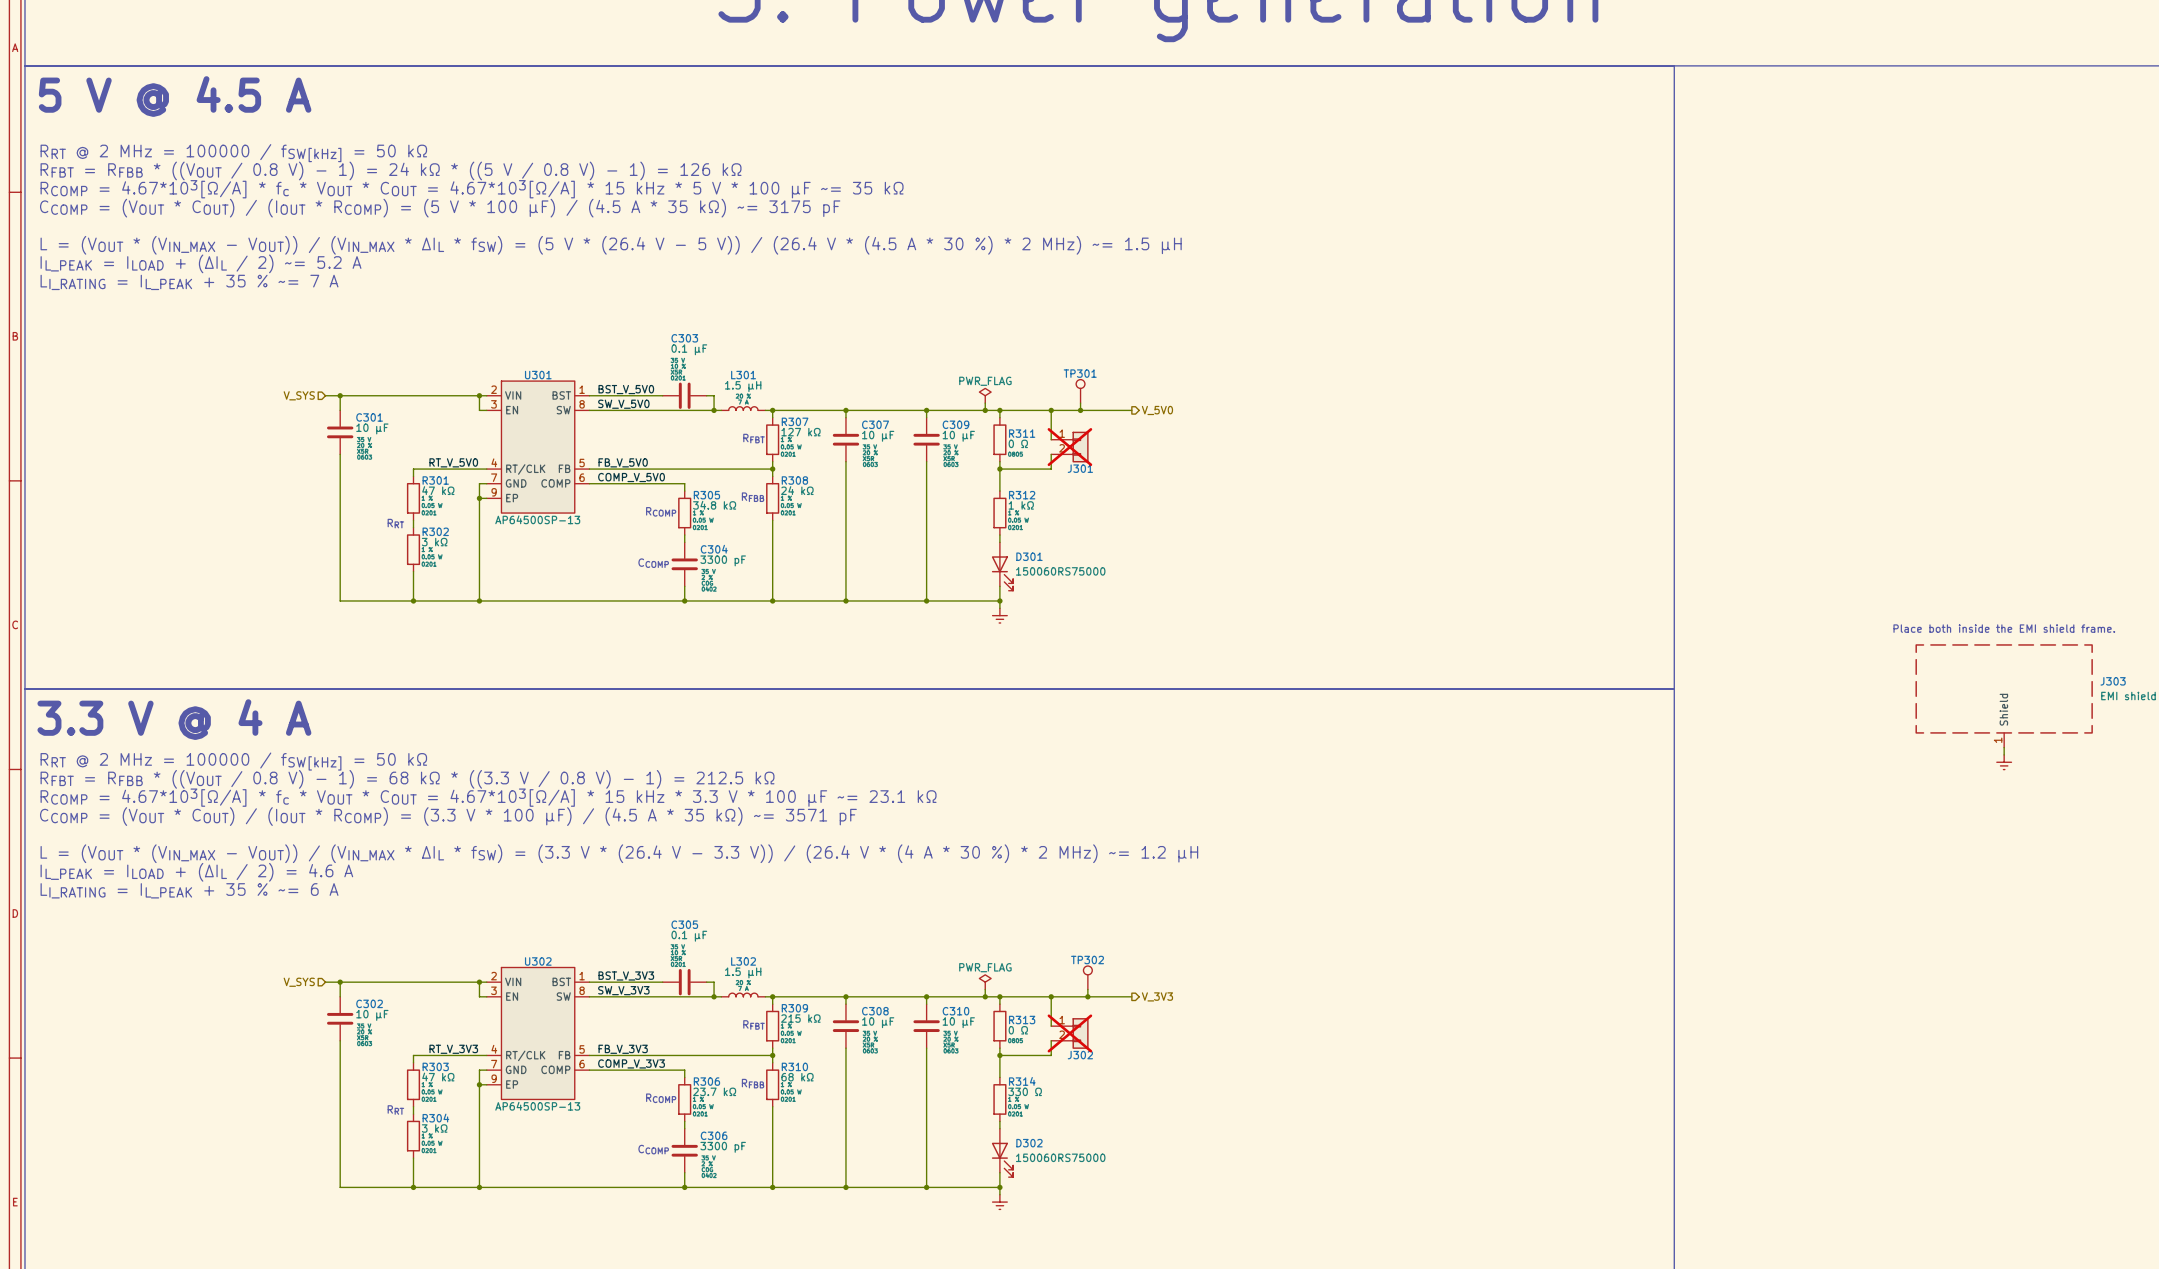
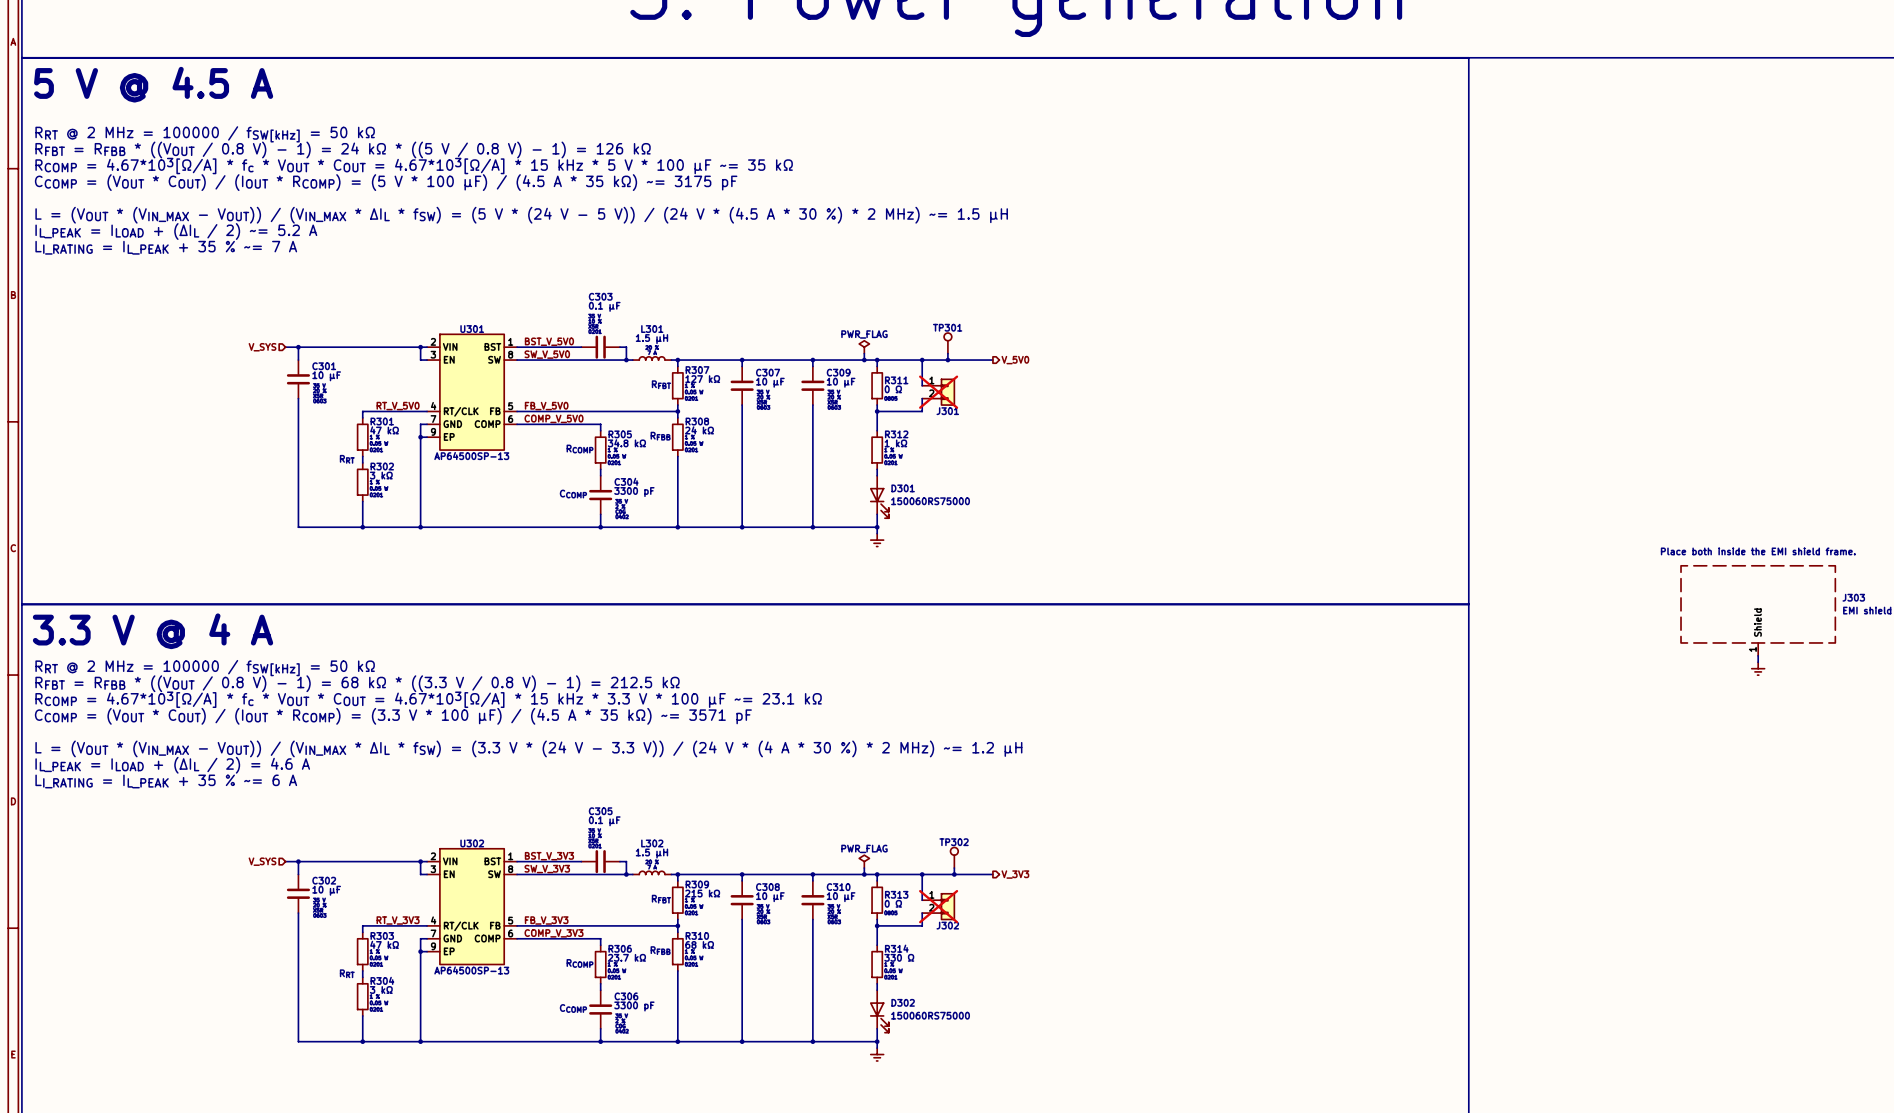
text: L = (VOUT * (VIN_MAX - VOUT)) / (VIN_MAX * ∆IL * fSW) = (5 V * (26.4 V - 5 V)) / (26.4 V * (4.5 A * 30 %) * 2 MHz) ~= 1.5 µH (611, 245) -> L = (VOUT * (VIN_MAX - VOUT)) / (VIN_MAX * ∆IL * fSW) = (5 V * (24 V - 5 V)) / (24 V * (4.5 A * 30 %) * 2 MHz) ~= 1.5 µH (521, 215)
text: L = (VOUT * (VIN_MAX - VOUT)) / (VIN_MAX * ∆IL * fSW) = (3.3 V * (26.4 V - 3.3 V)) / (26.4 V * (4 A * 30 %) * 2 MHz) ~= 1.2 µH (619, 853) -> L = (VOUT * (VIN_MAX - VOUT)) / (VIN_MAX * ∆IL * fSW) = (3.3 V * (24 V - 3.3 V)) / (24 V * (4 A * 30 %) * 2 MHz) ~= 1.2 µH (528, 748)

